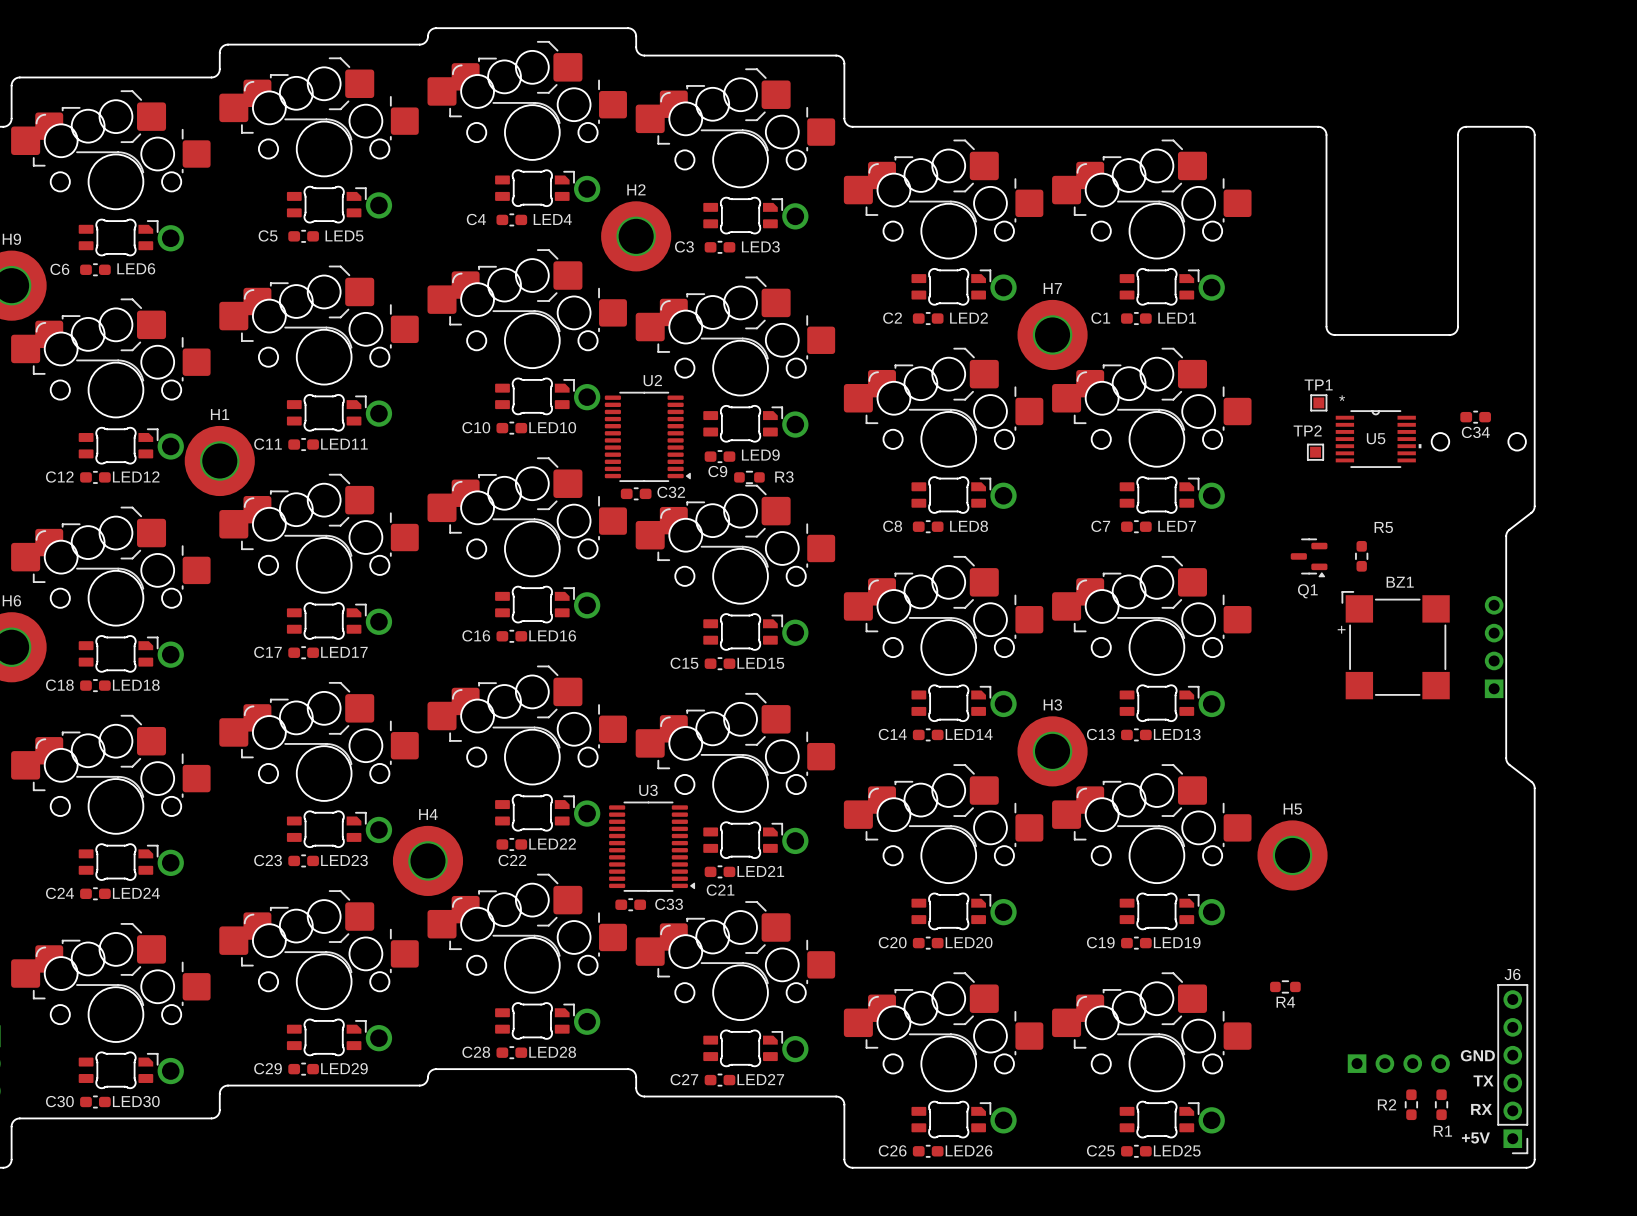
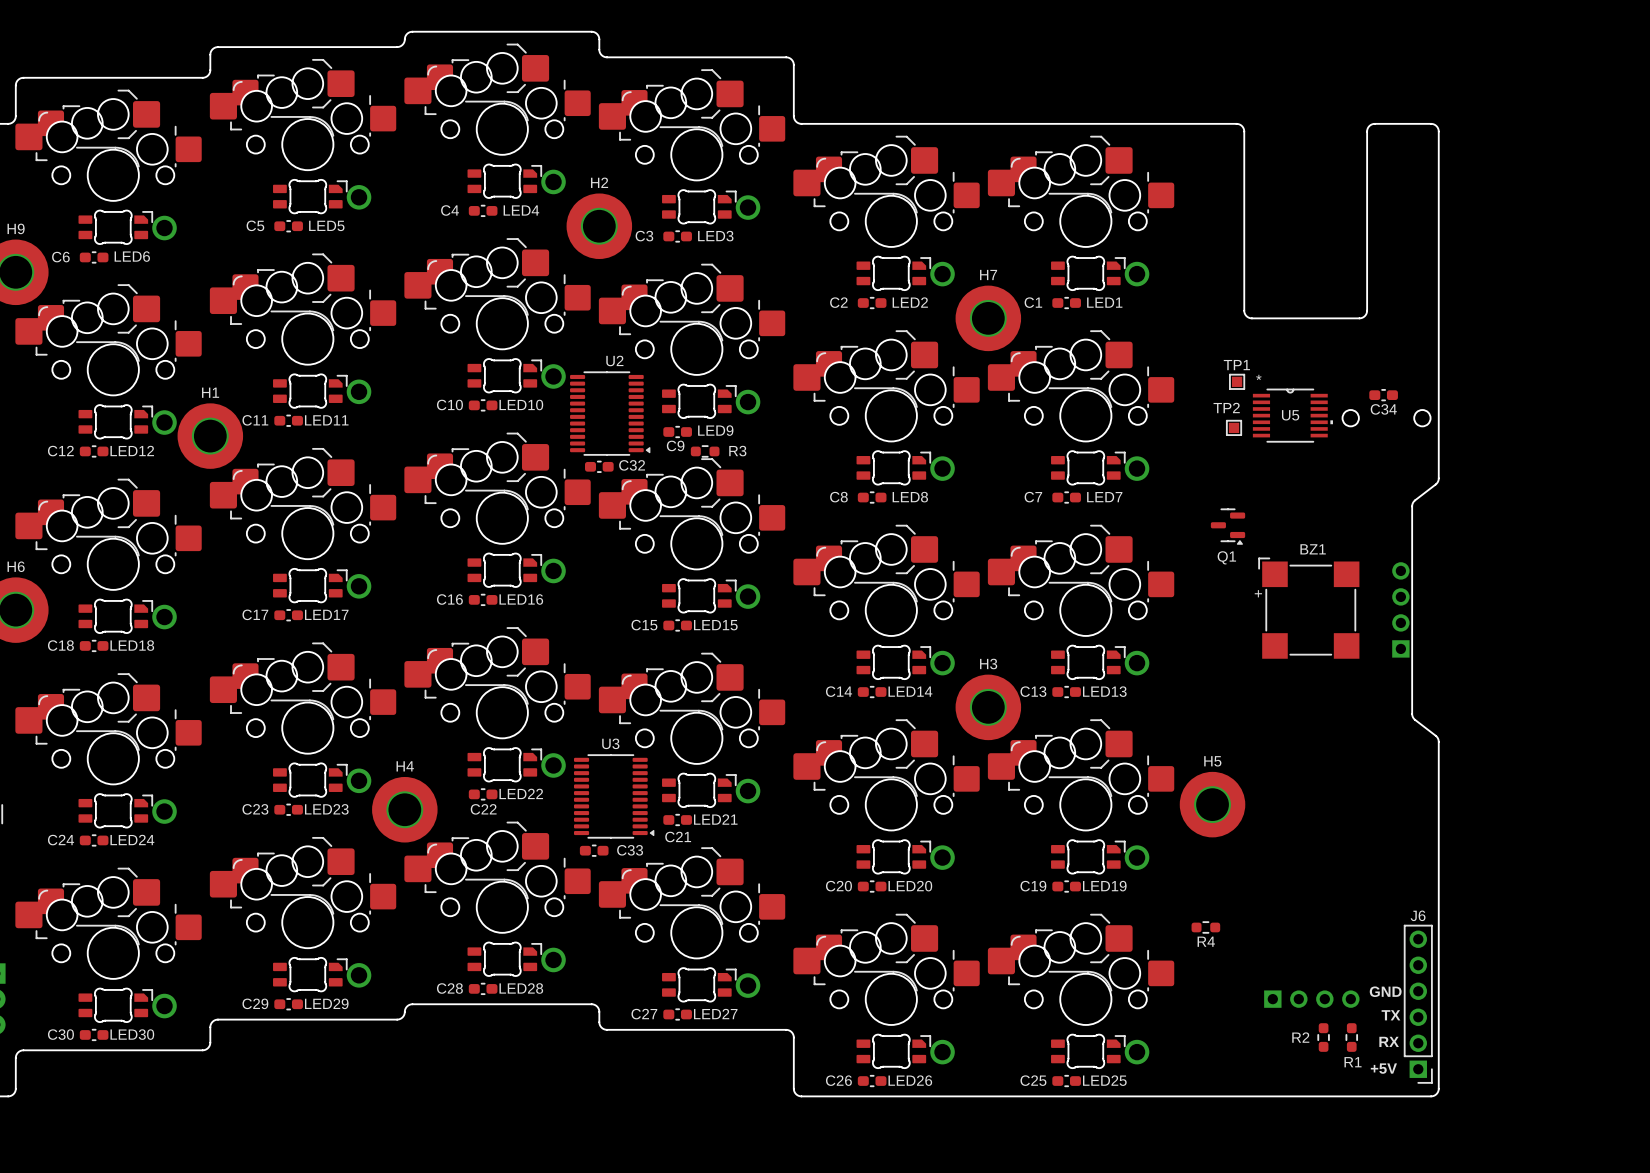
R5: (1361, 556) -> none

